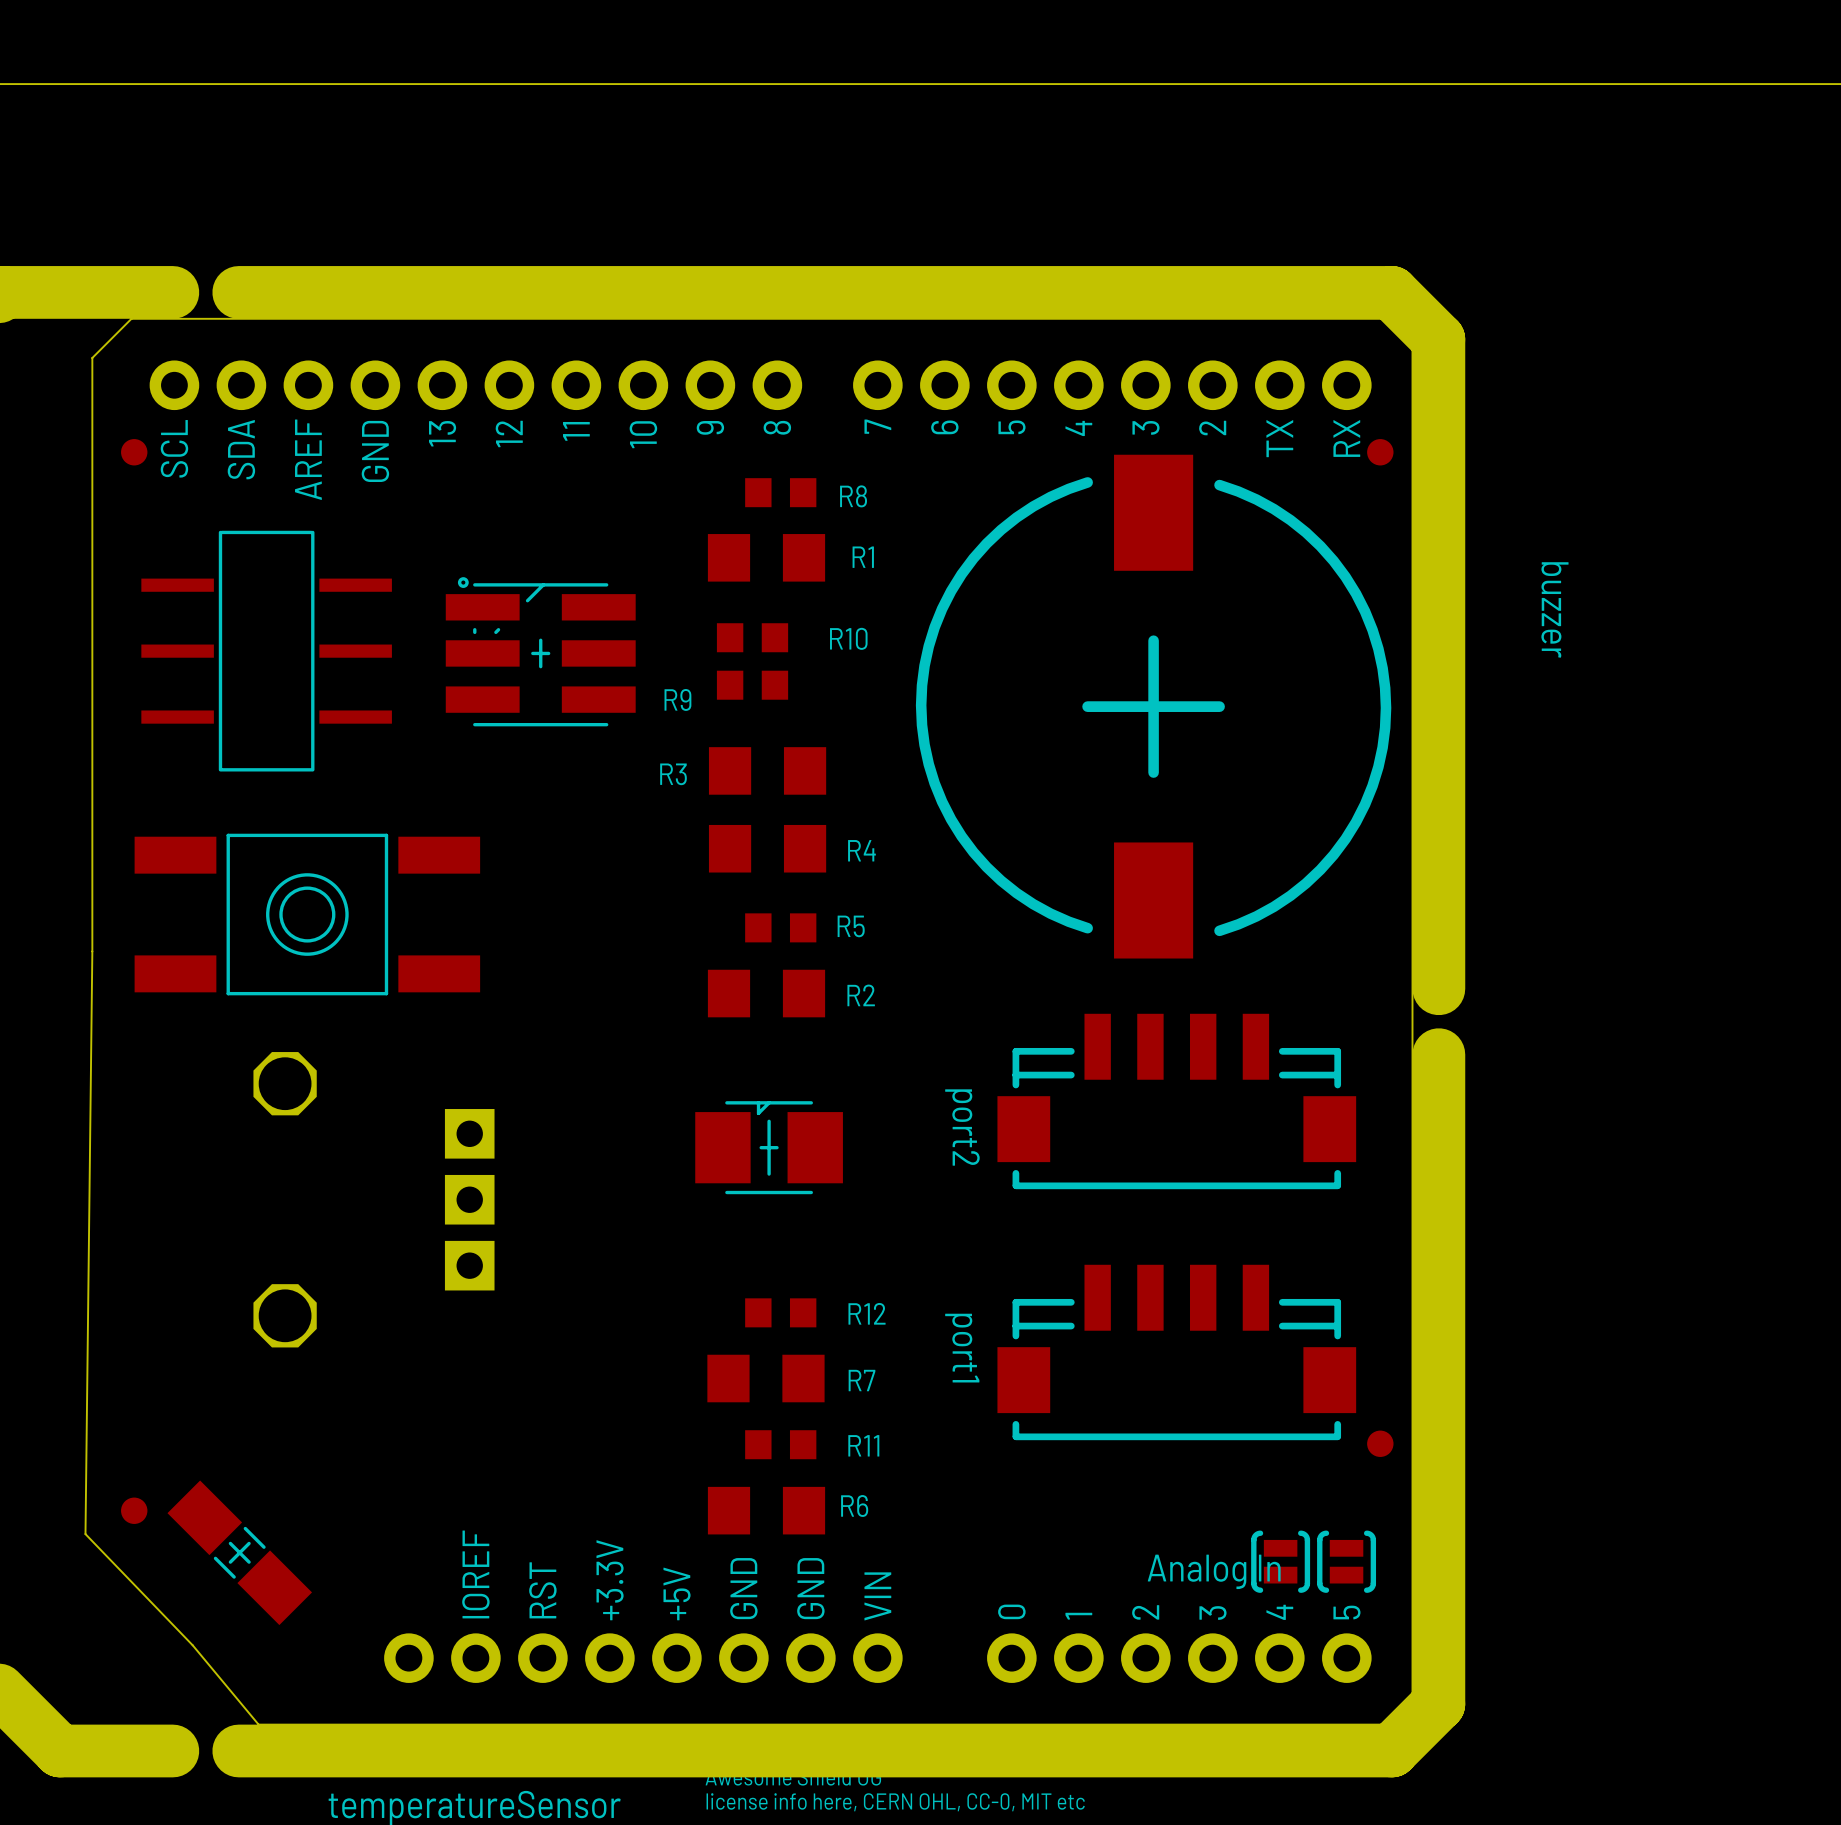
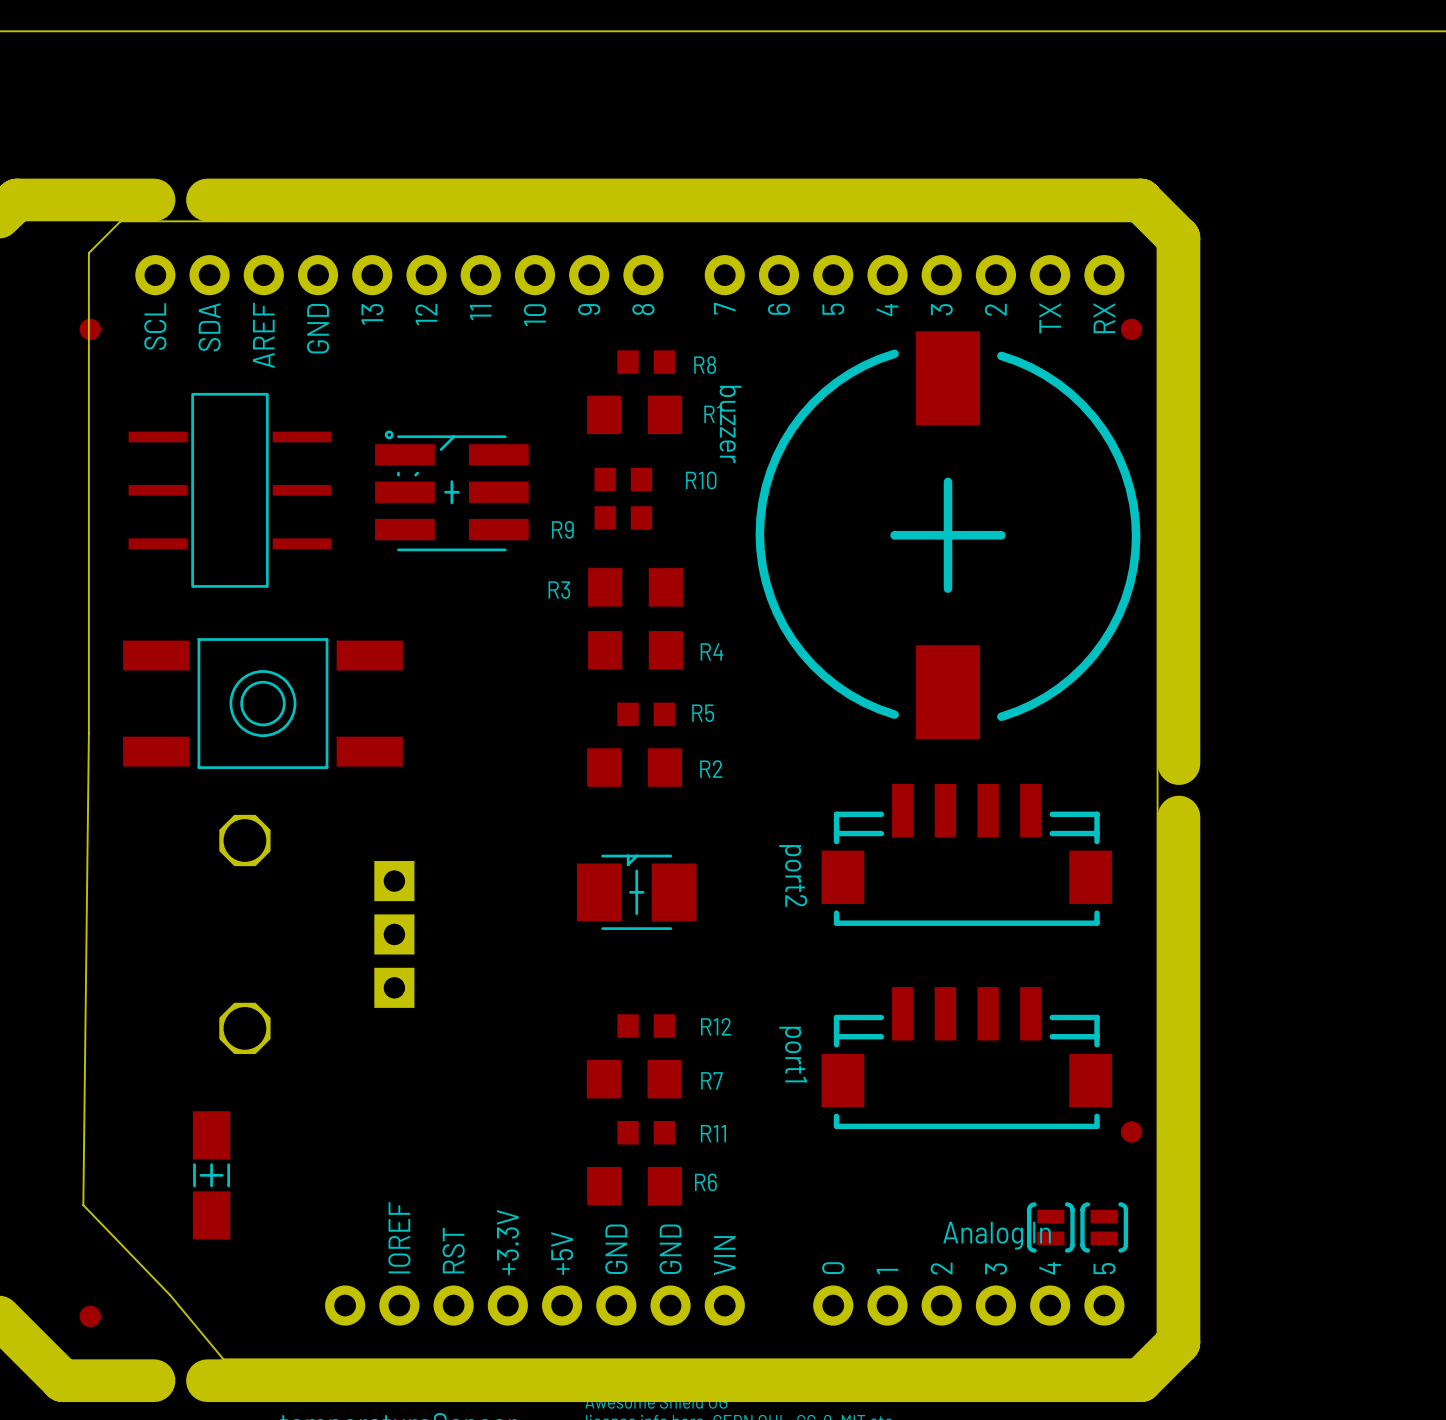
part position: (134, 452) -> (90, 329)
text: none -> buzzer (730, 424)
text: buzzer (1554, 610) -> none
part: none -> (211, 1175)
part position: (134, 1510) -> (90, 1316)
part: (239, 1552) -> none

